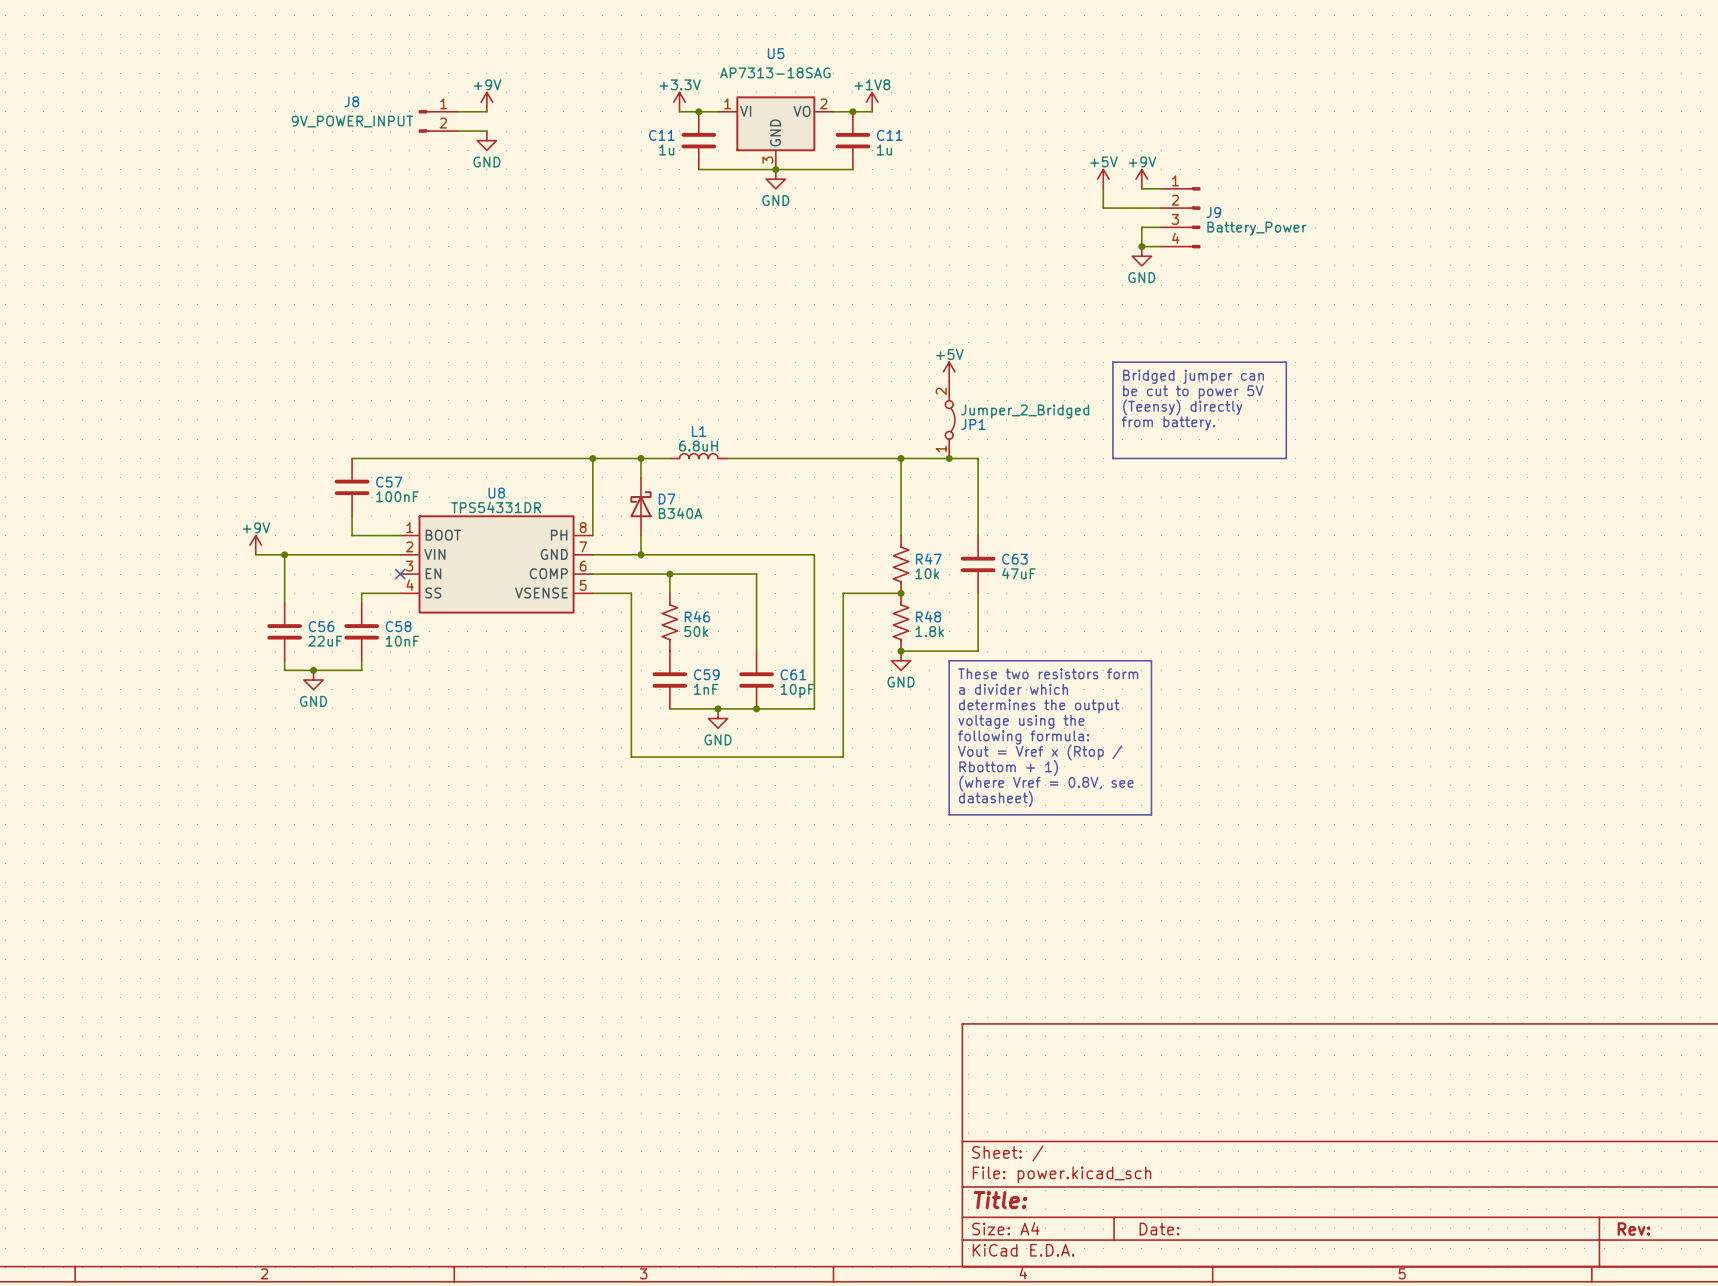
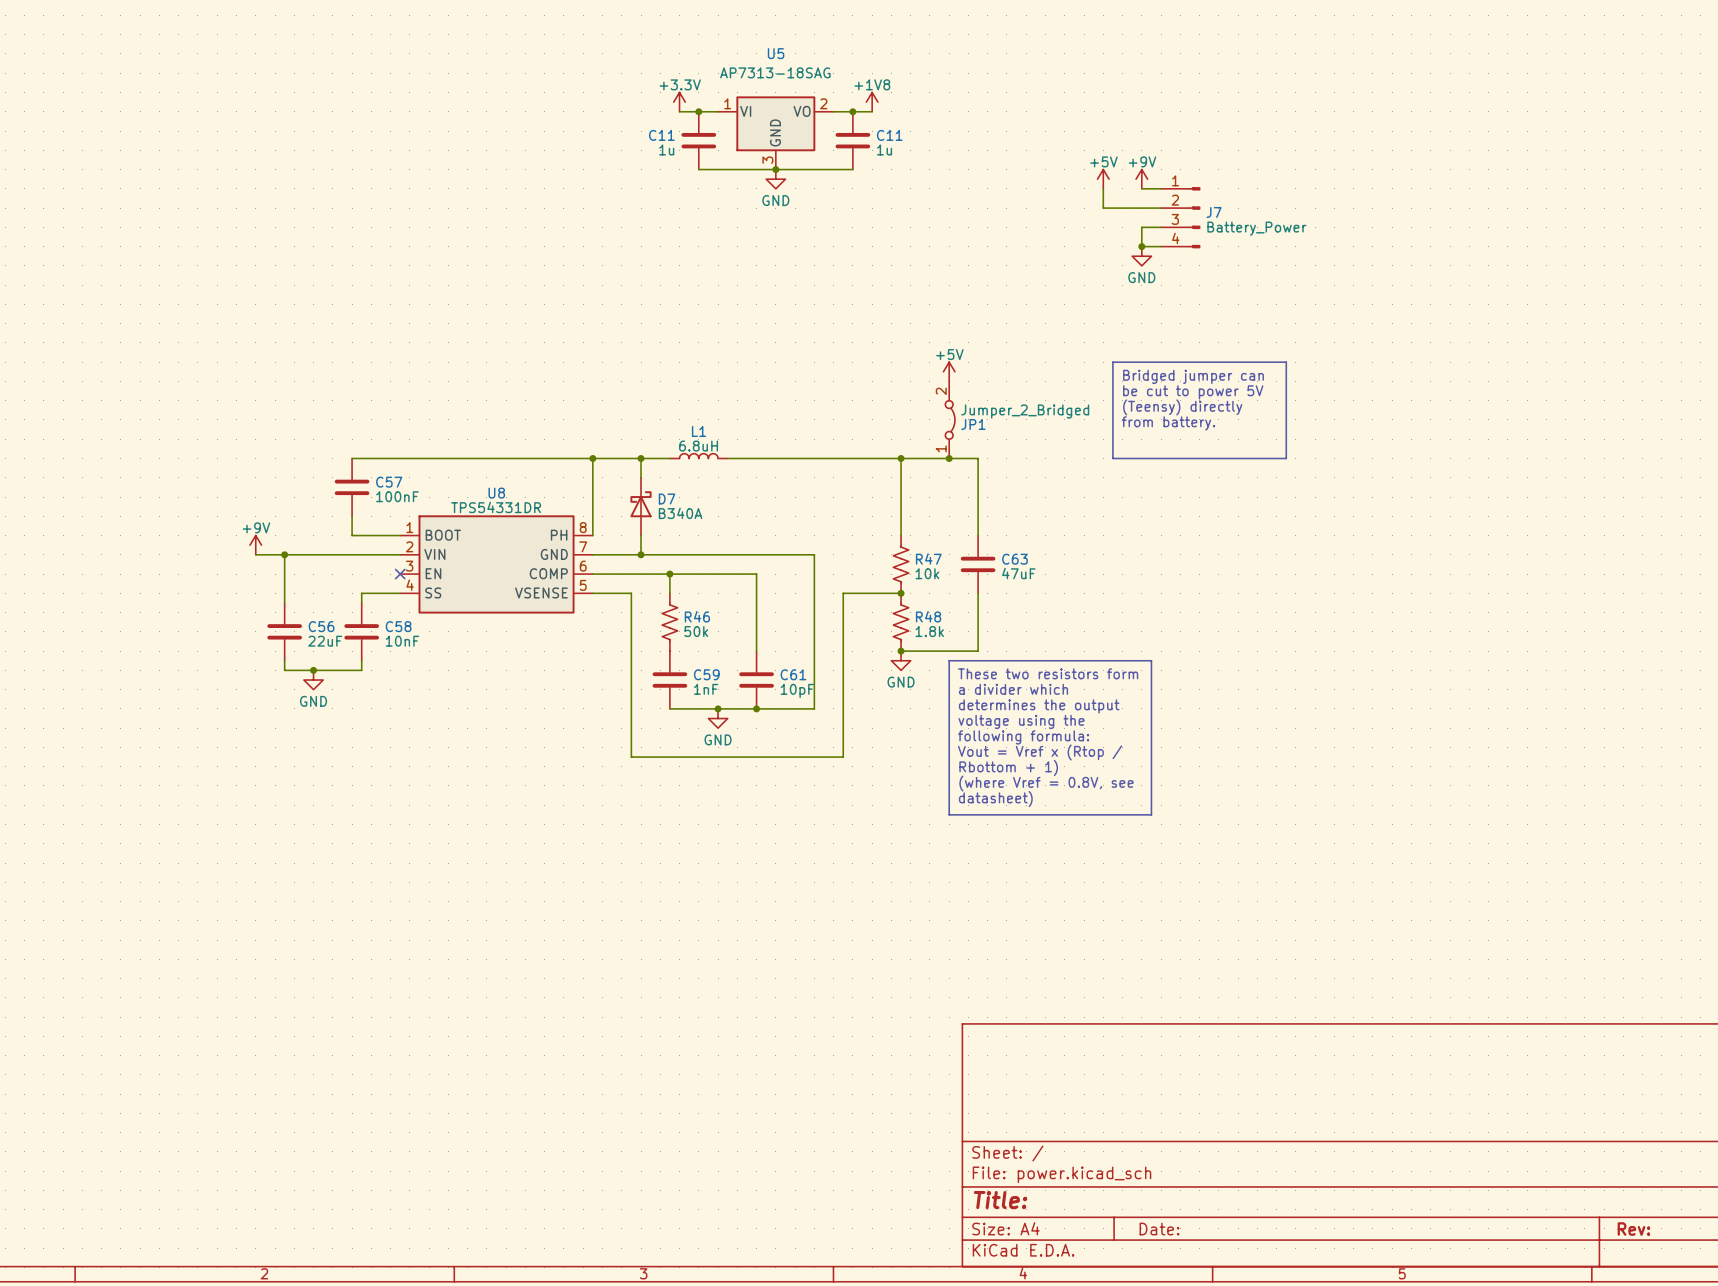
power symbol: +9V (486, 102) -> none
wire: (458, 111) (486, 111) -> none
J8: 9V_POWER_INPUT (438, 121) -> none
wire: (458, 131) (486, 131) -> none
power symbol: GND (486, 140) -> none
J9 name: J9 (1213, 212) -> J7 (1214, 212)

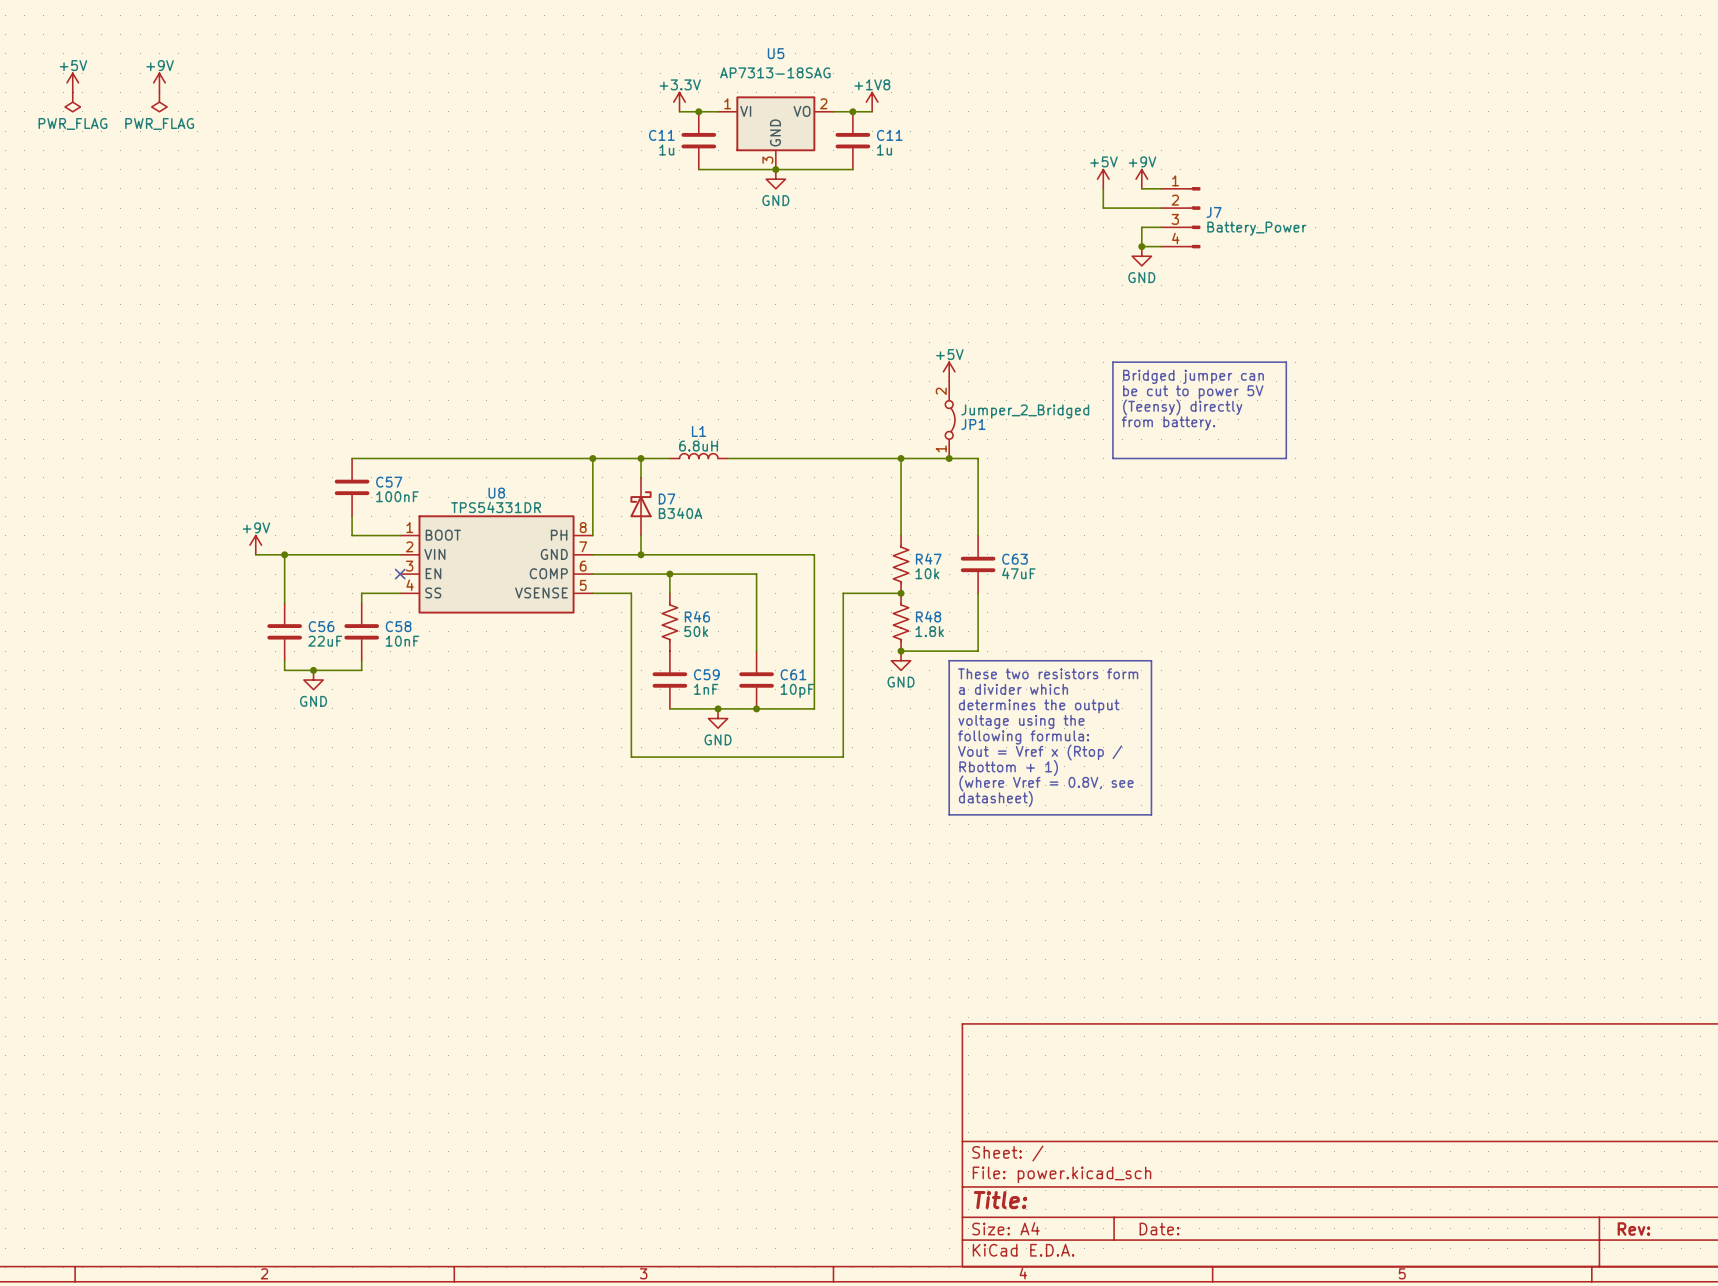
power symbol: none -> +5V (72, 82)
power symbol: none -> +9V (159, 82)
power symbol: none -> PWR_FLAG (72, 102)
power symbol: none -> PWR_FLAG (159, 102)

